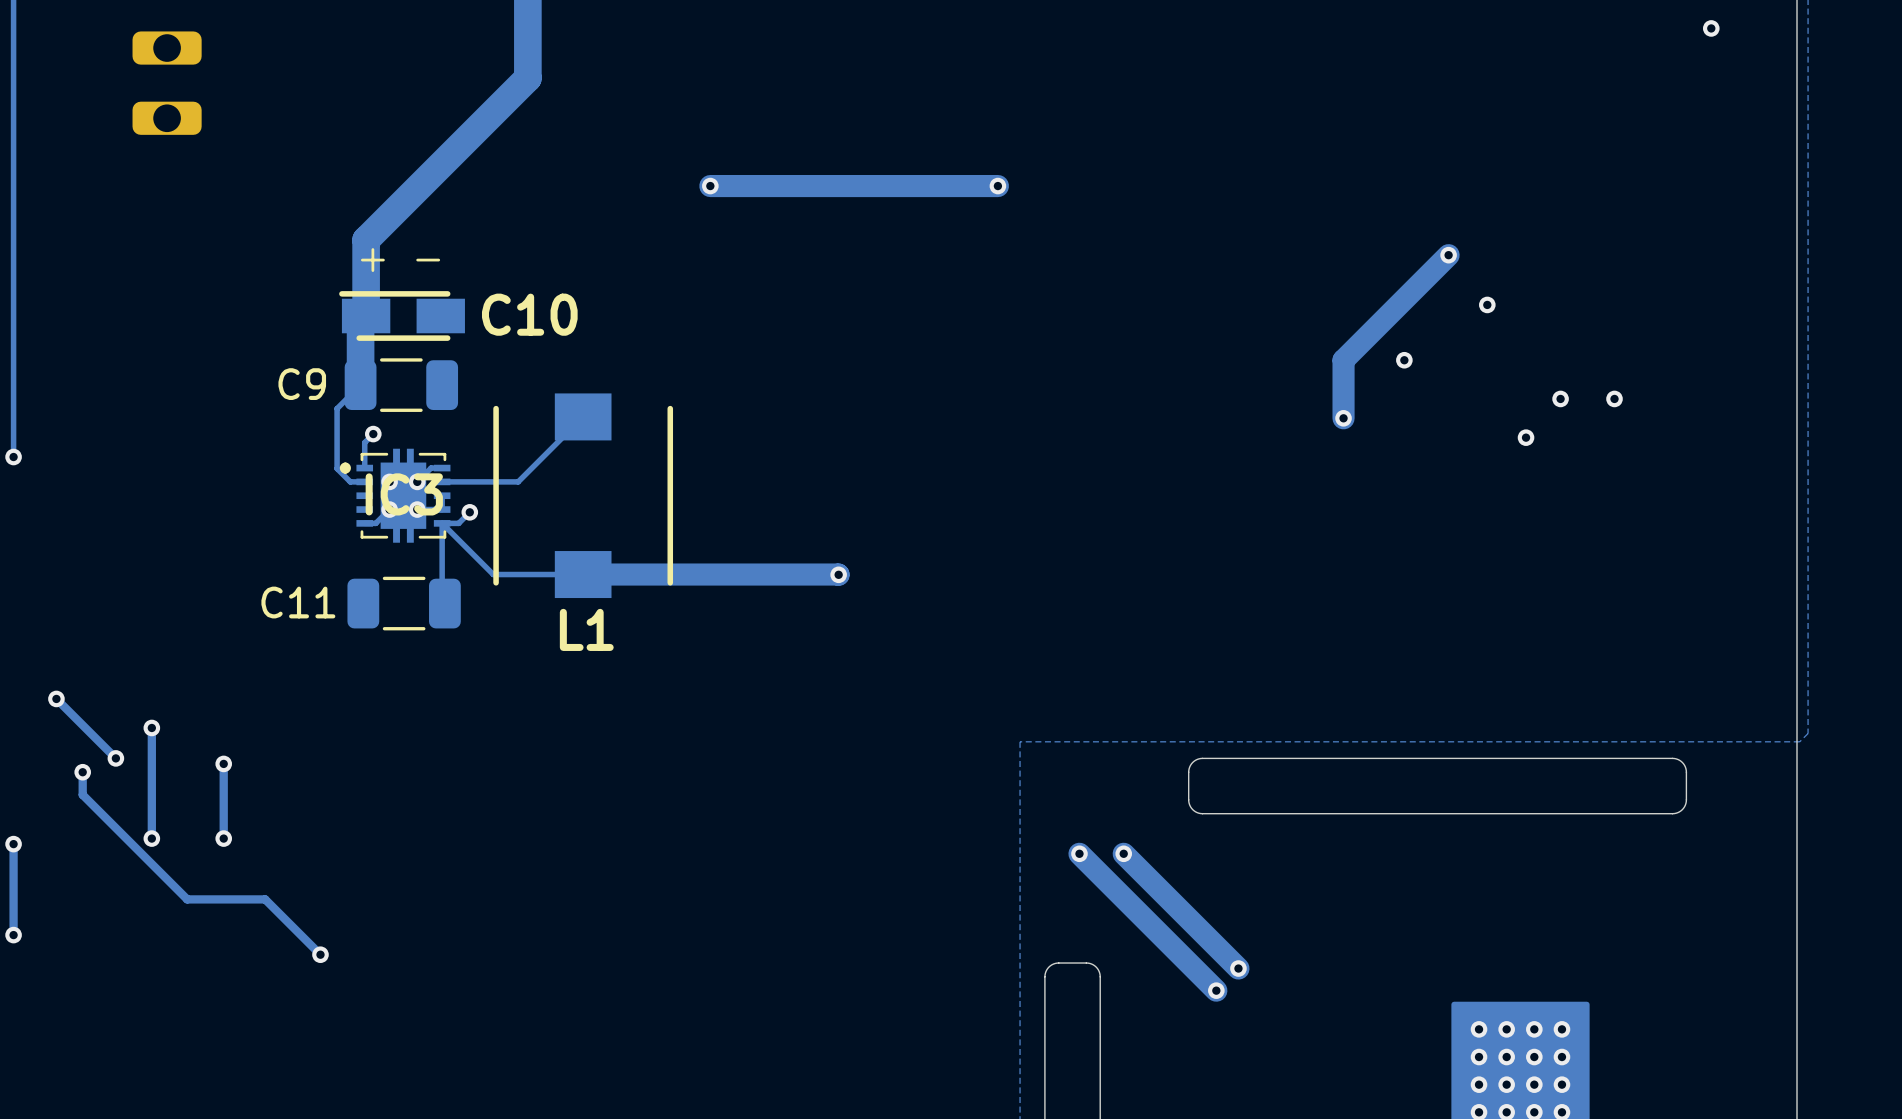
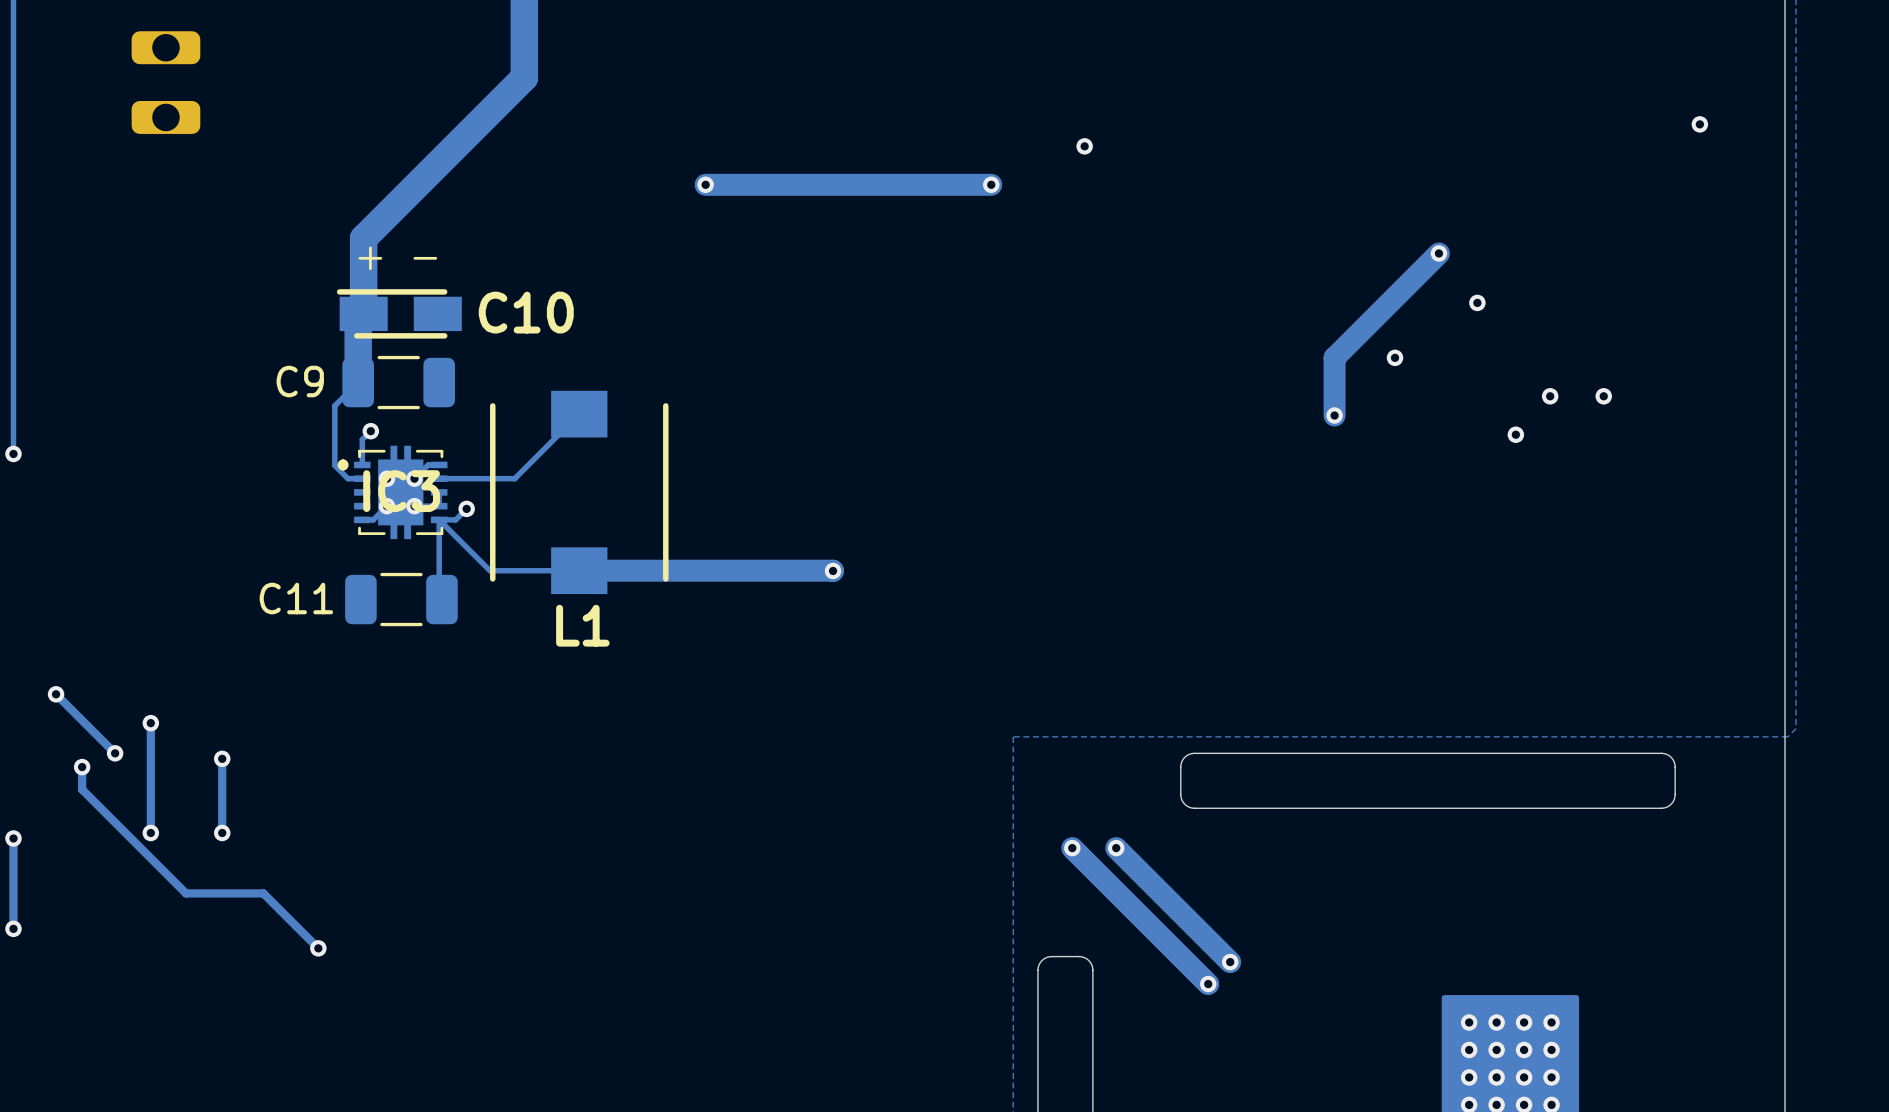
via position: (1711, 28) -> (1699, 124)
via: none -> (1084, 146)

